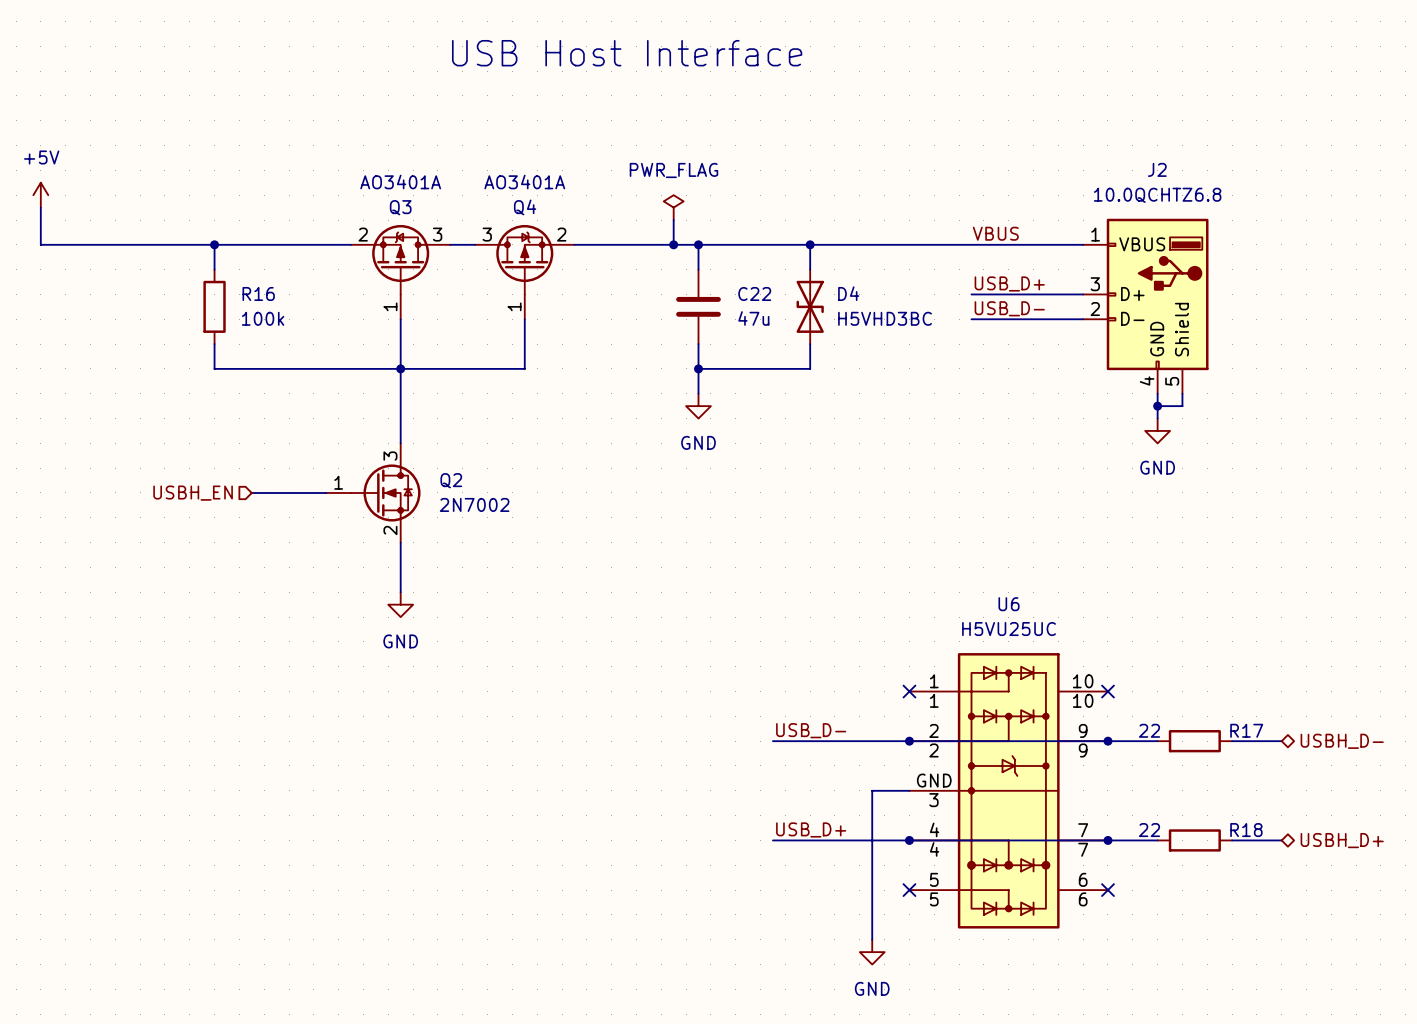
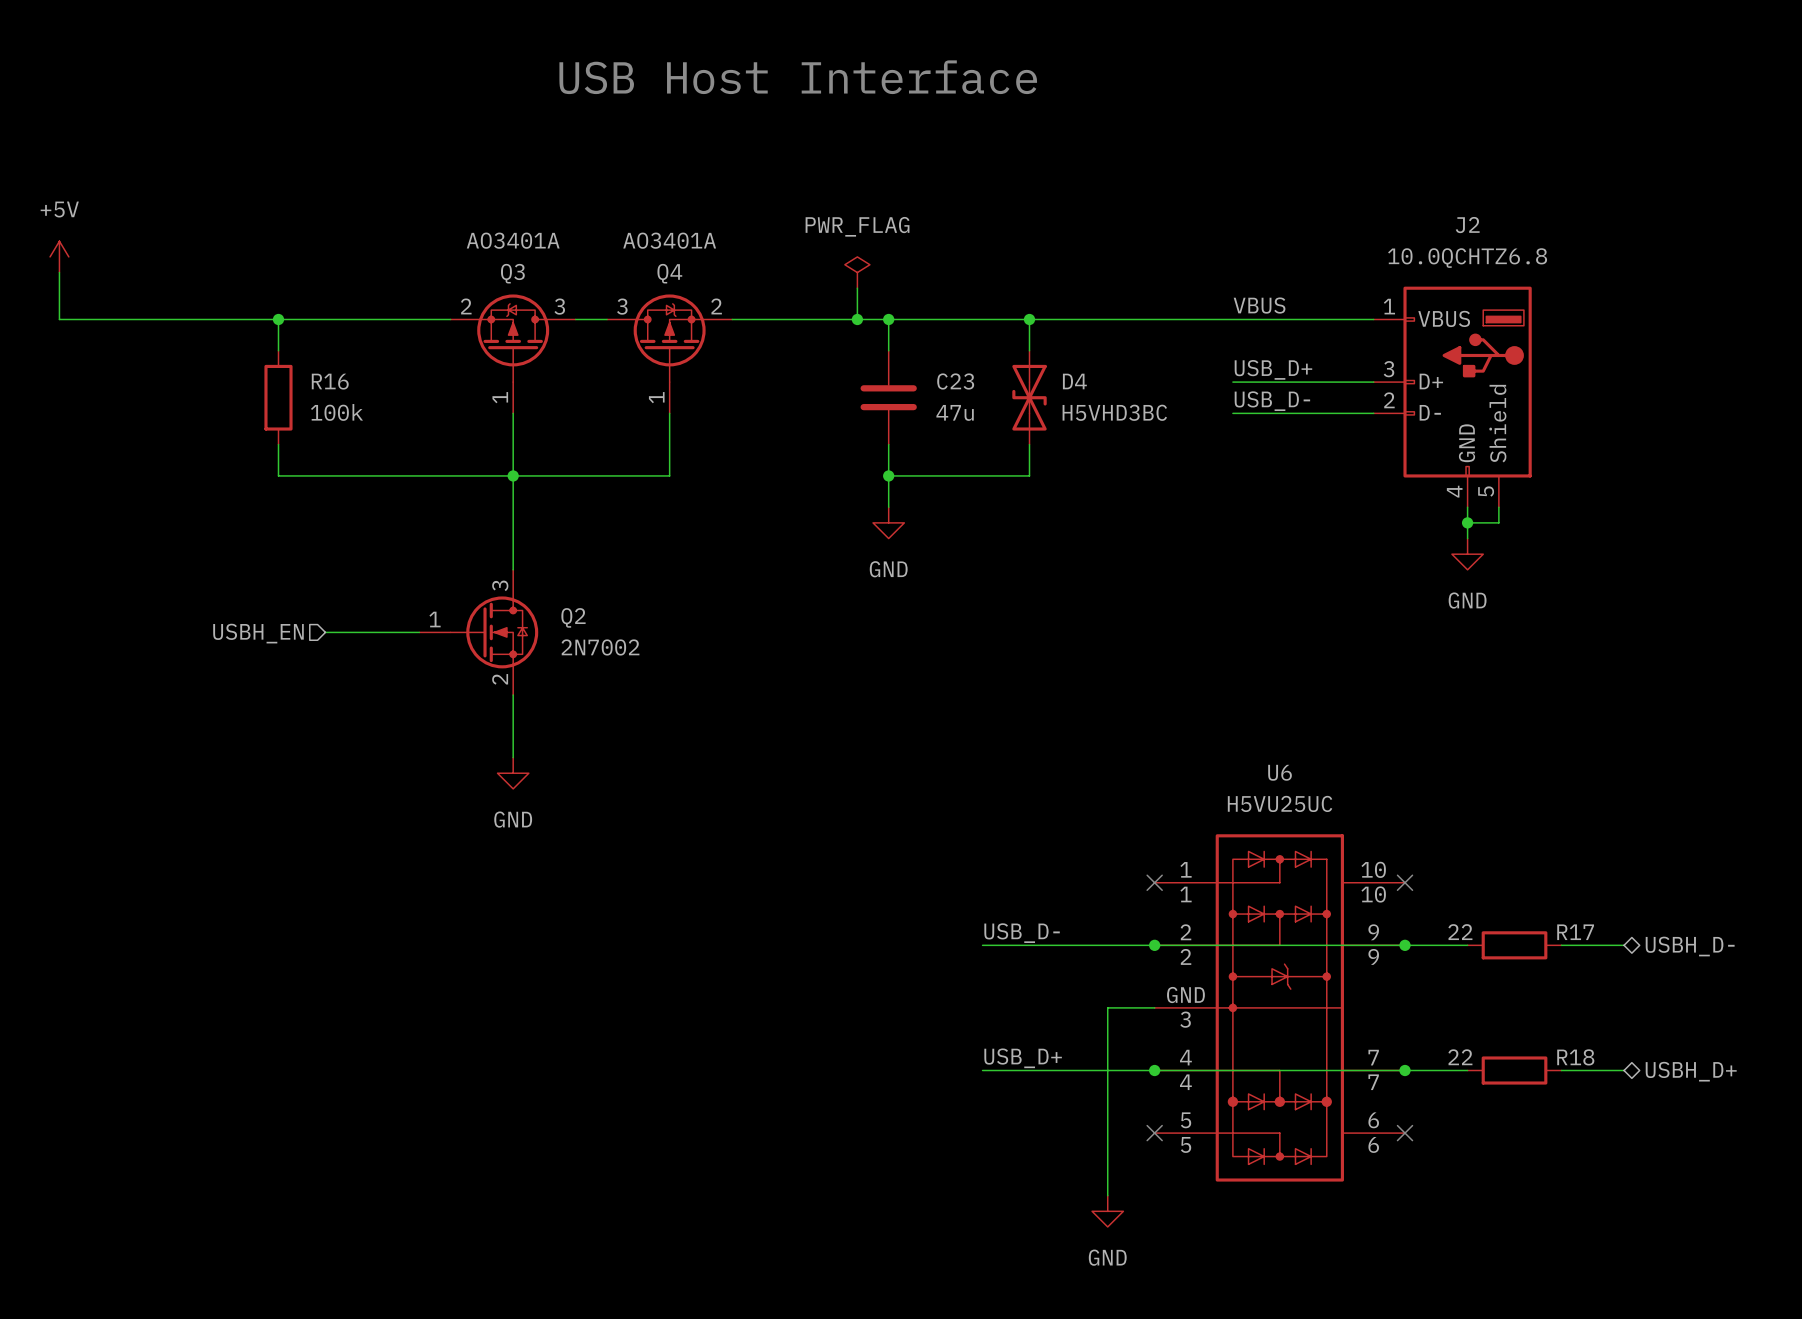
C22 name: C22 (754, 293) -> C23 (955, 381)

